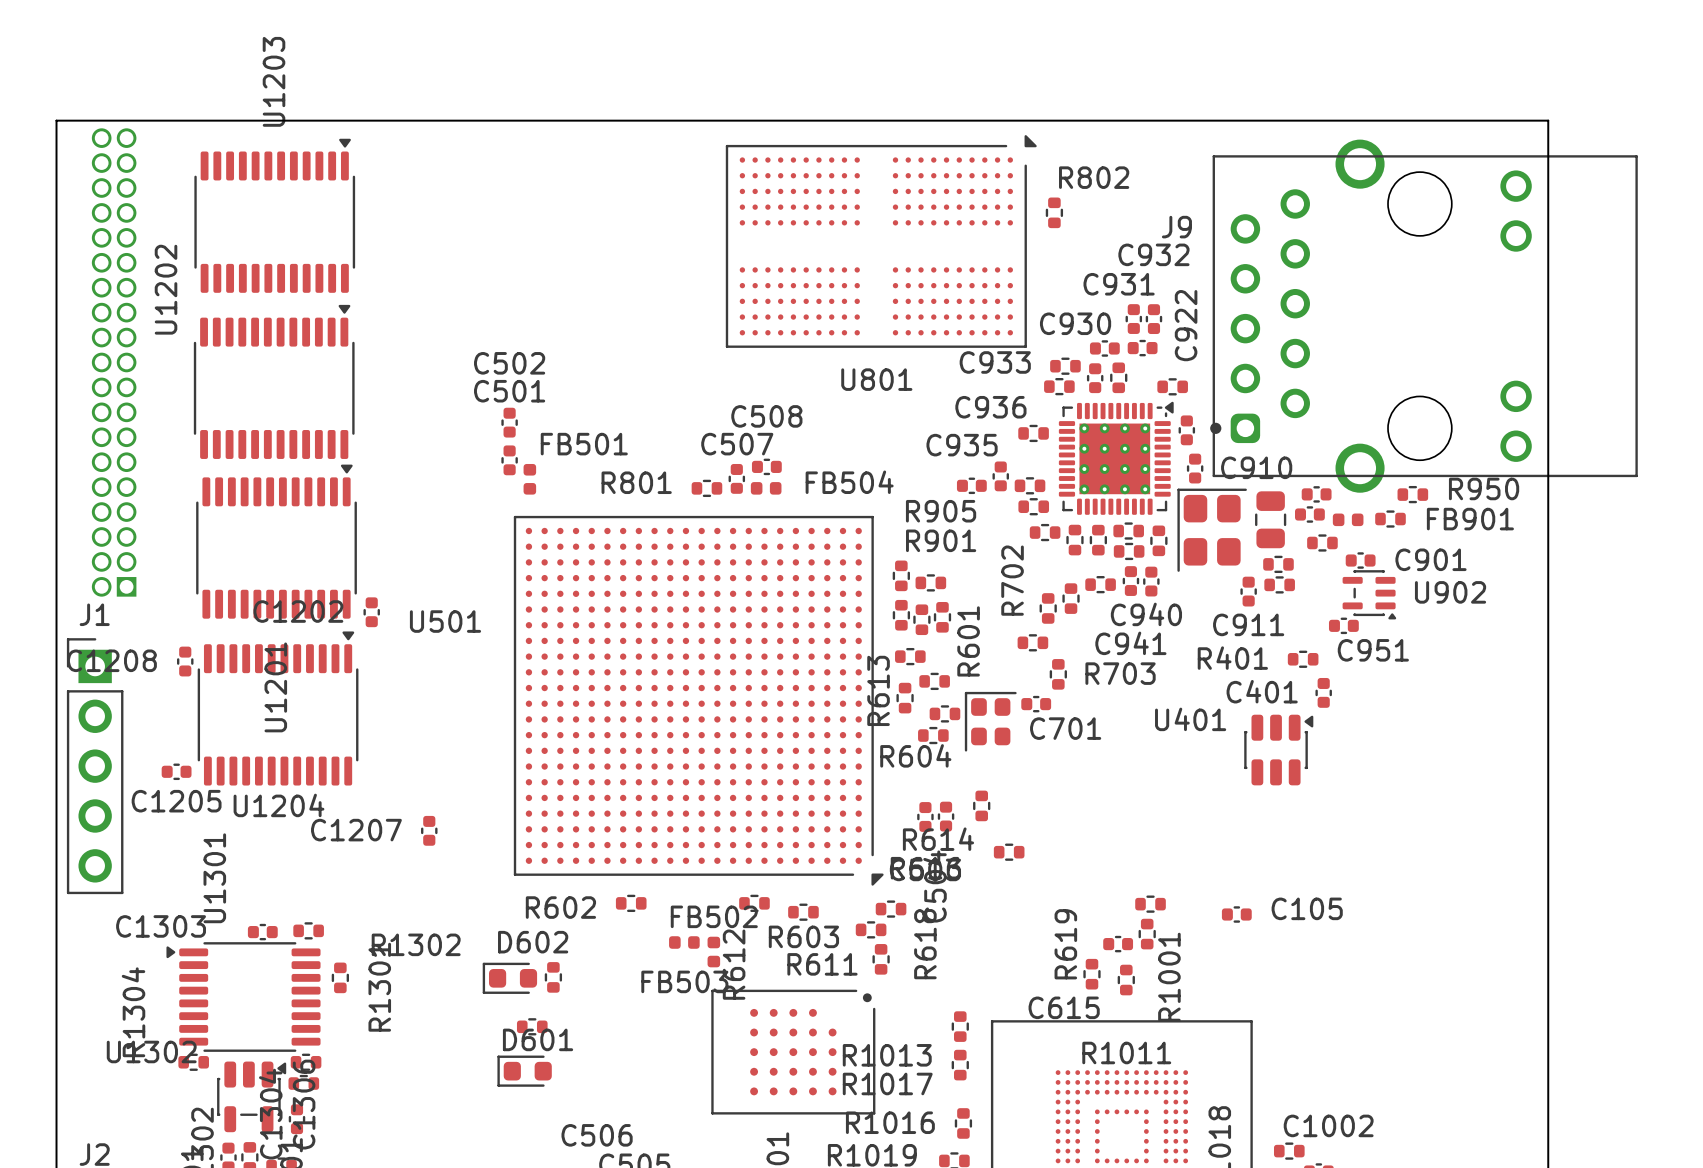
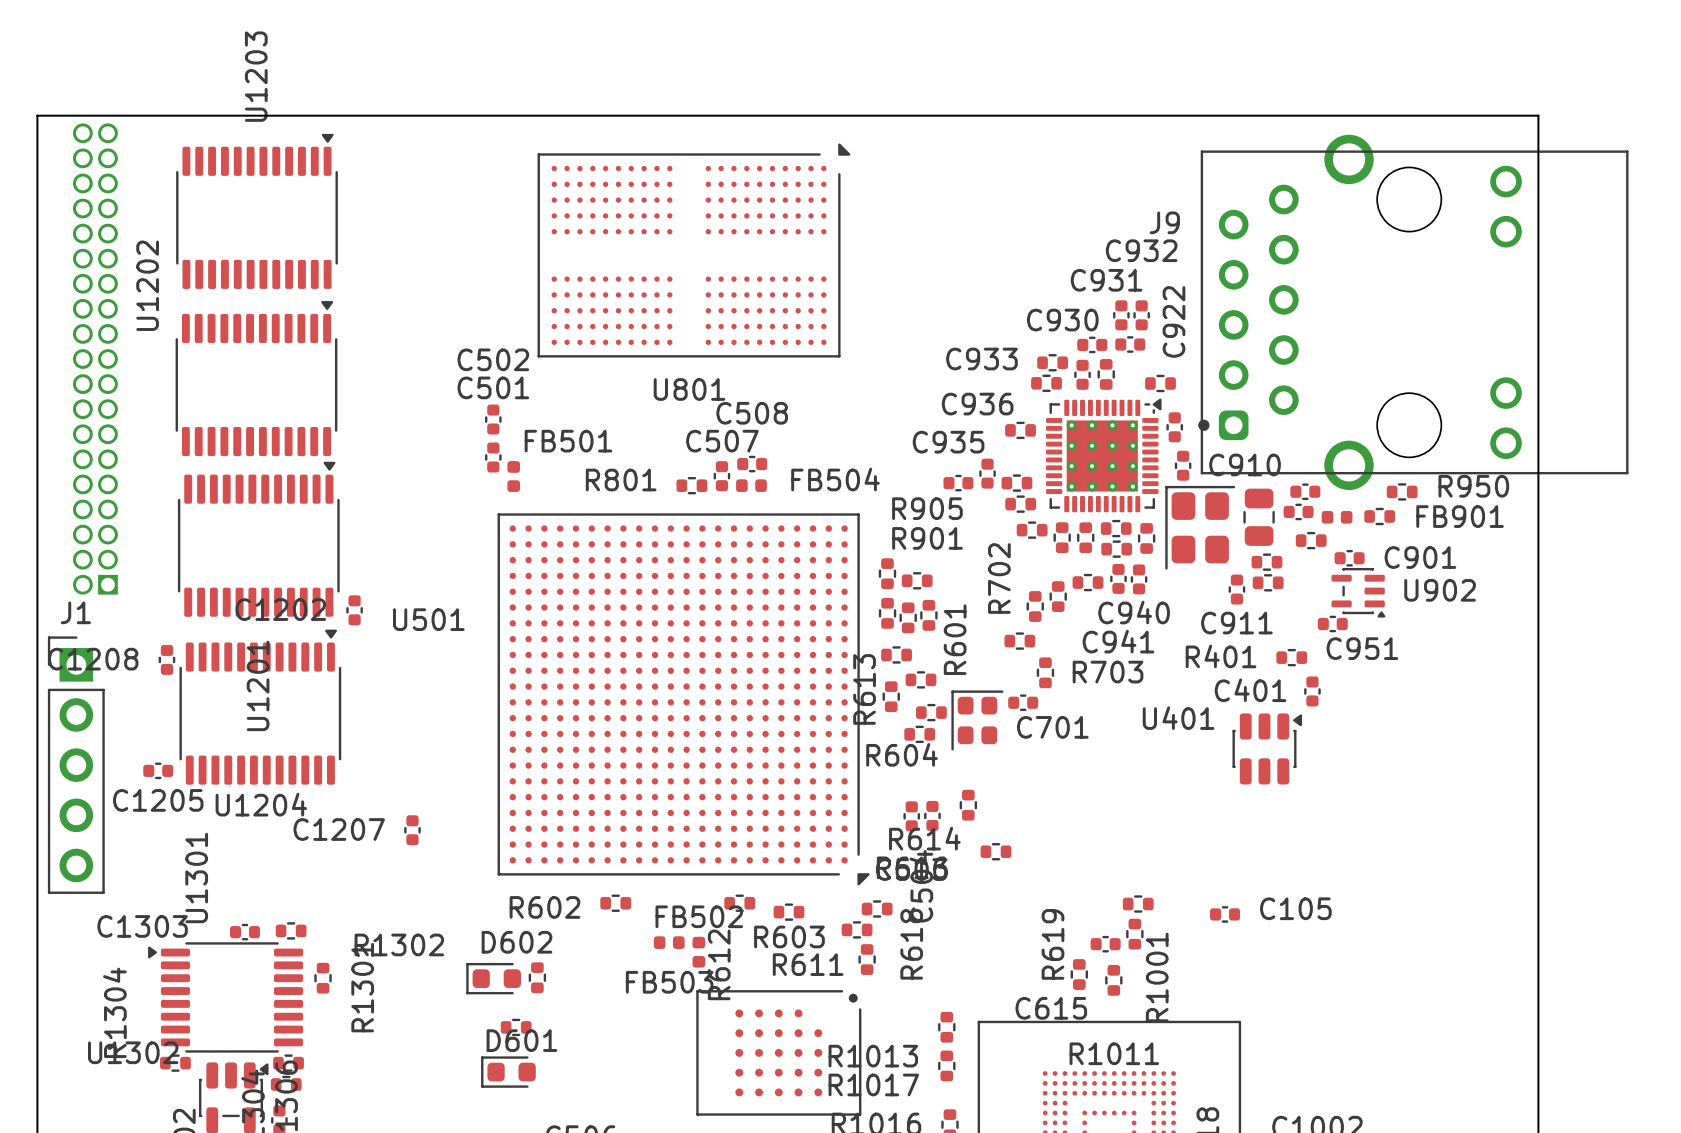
R802: (1054, 212) -> none
U801 position: (881, 241) -> (693, 250)

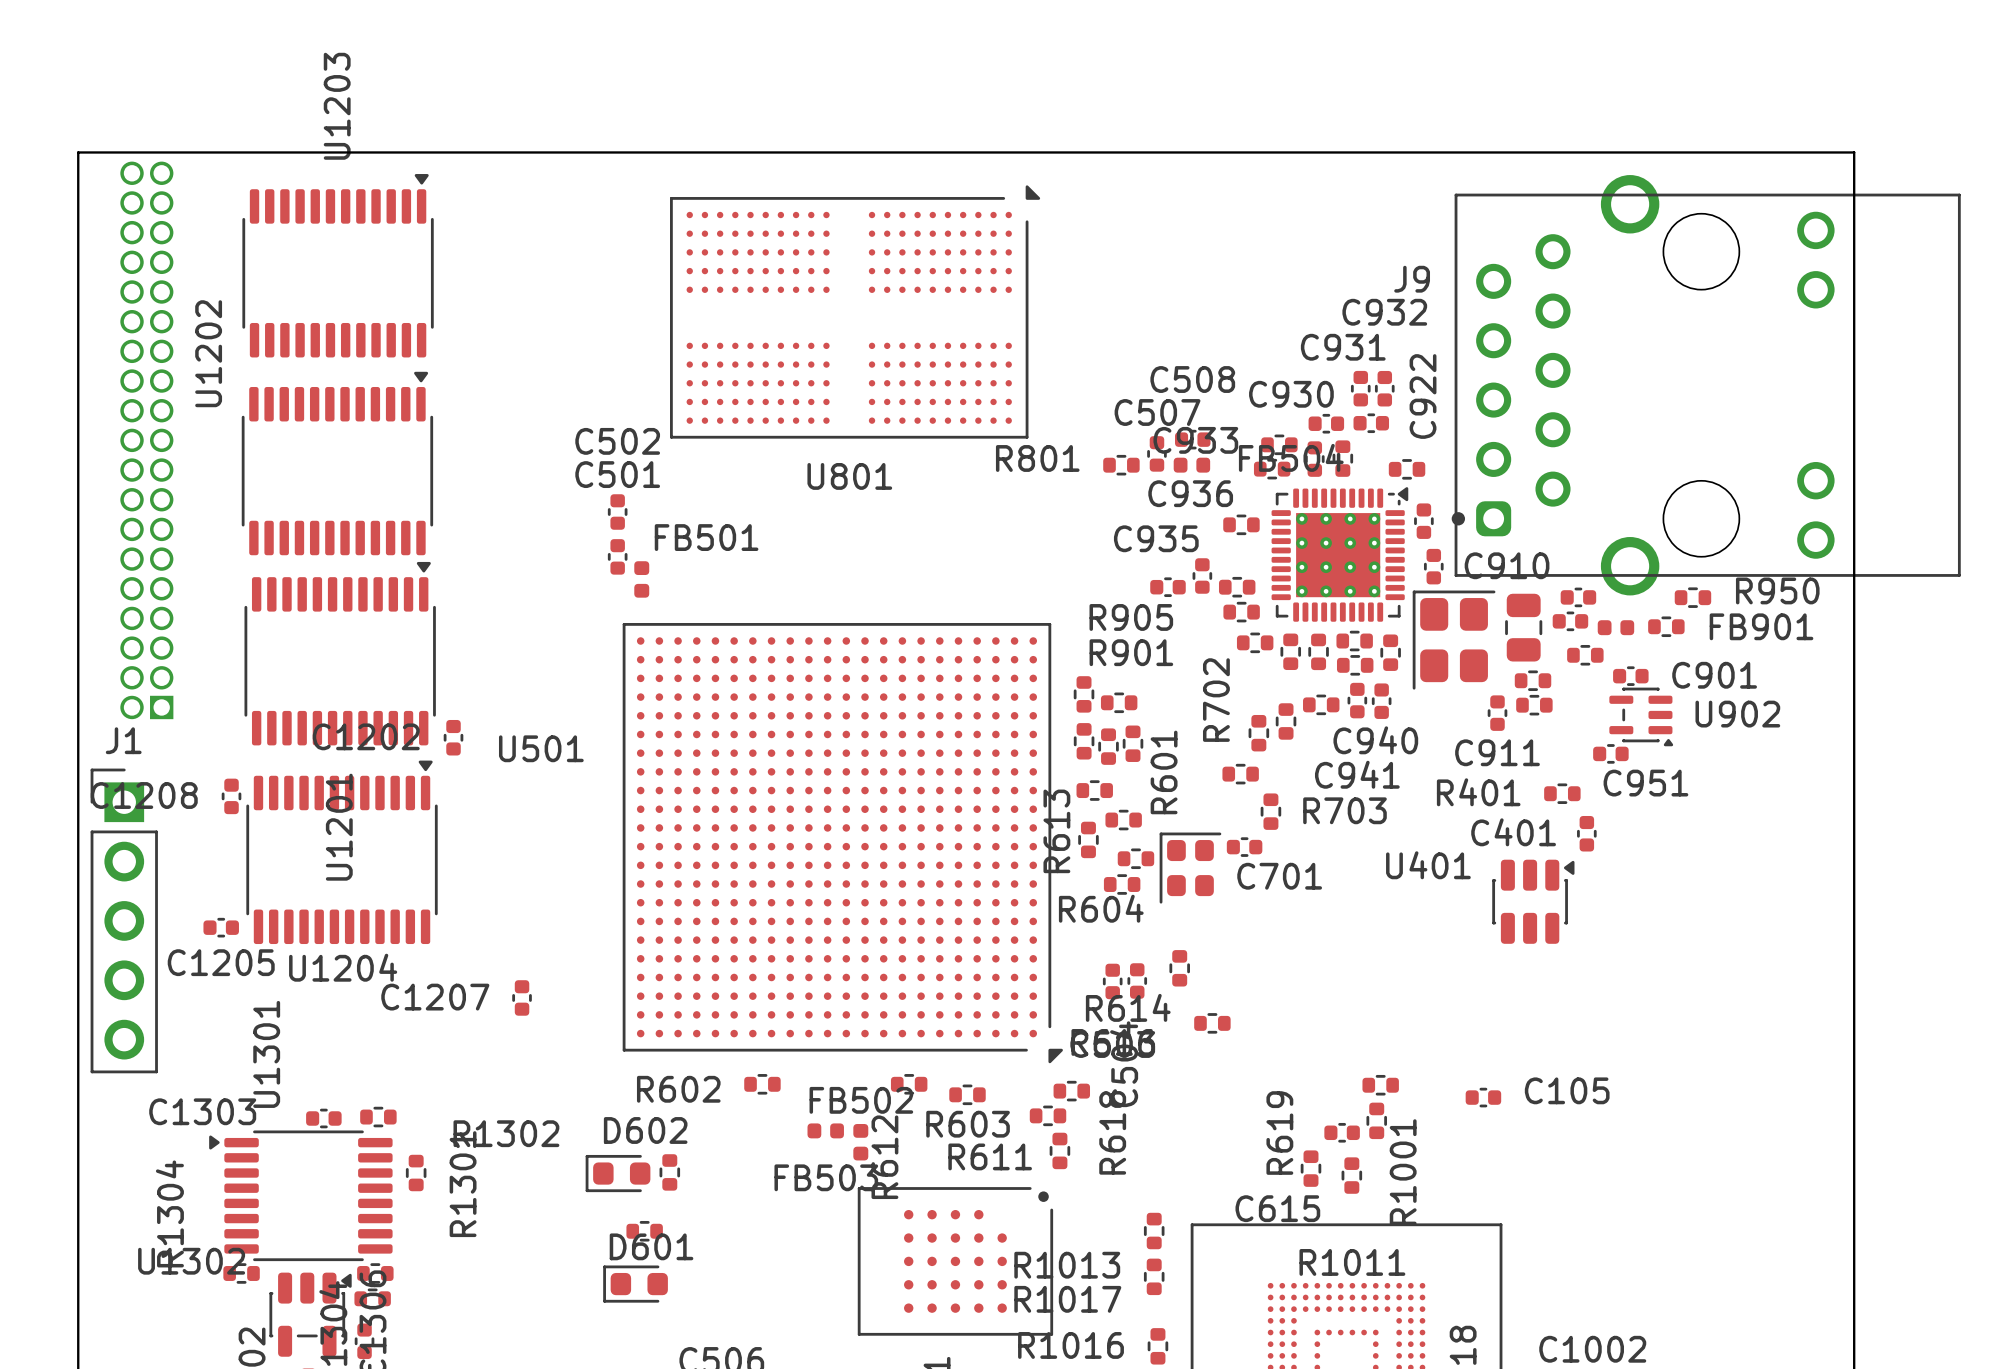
C508 position: (752, 464) -> (1192, 439)
C507 position: (721, 476) -> (1156, 453)
R801 position: (691, 485) -> (1121, 465)
FB504 position: (751, 485) -> (1191, 465)

